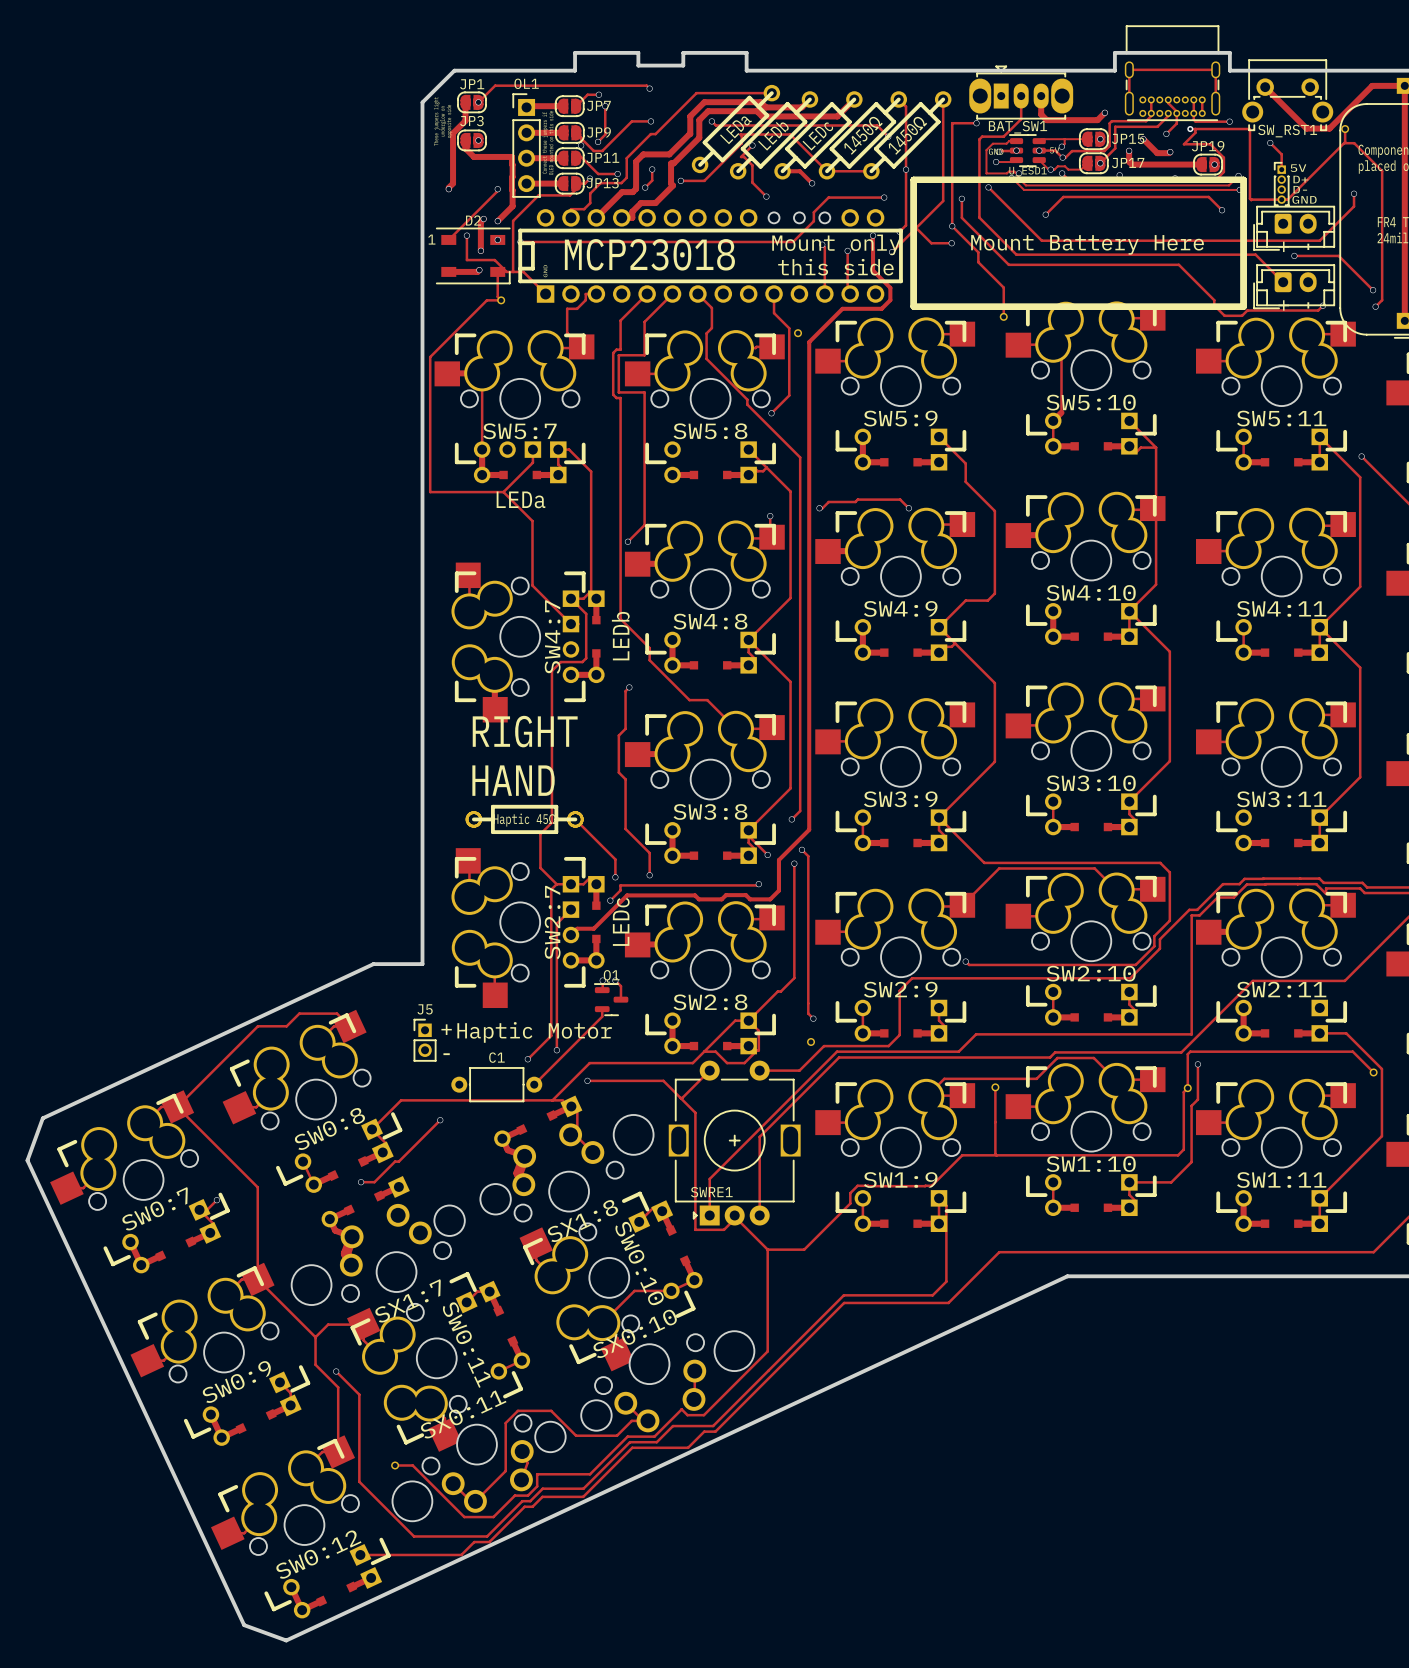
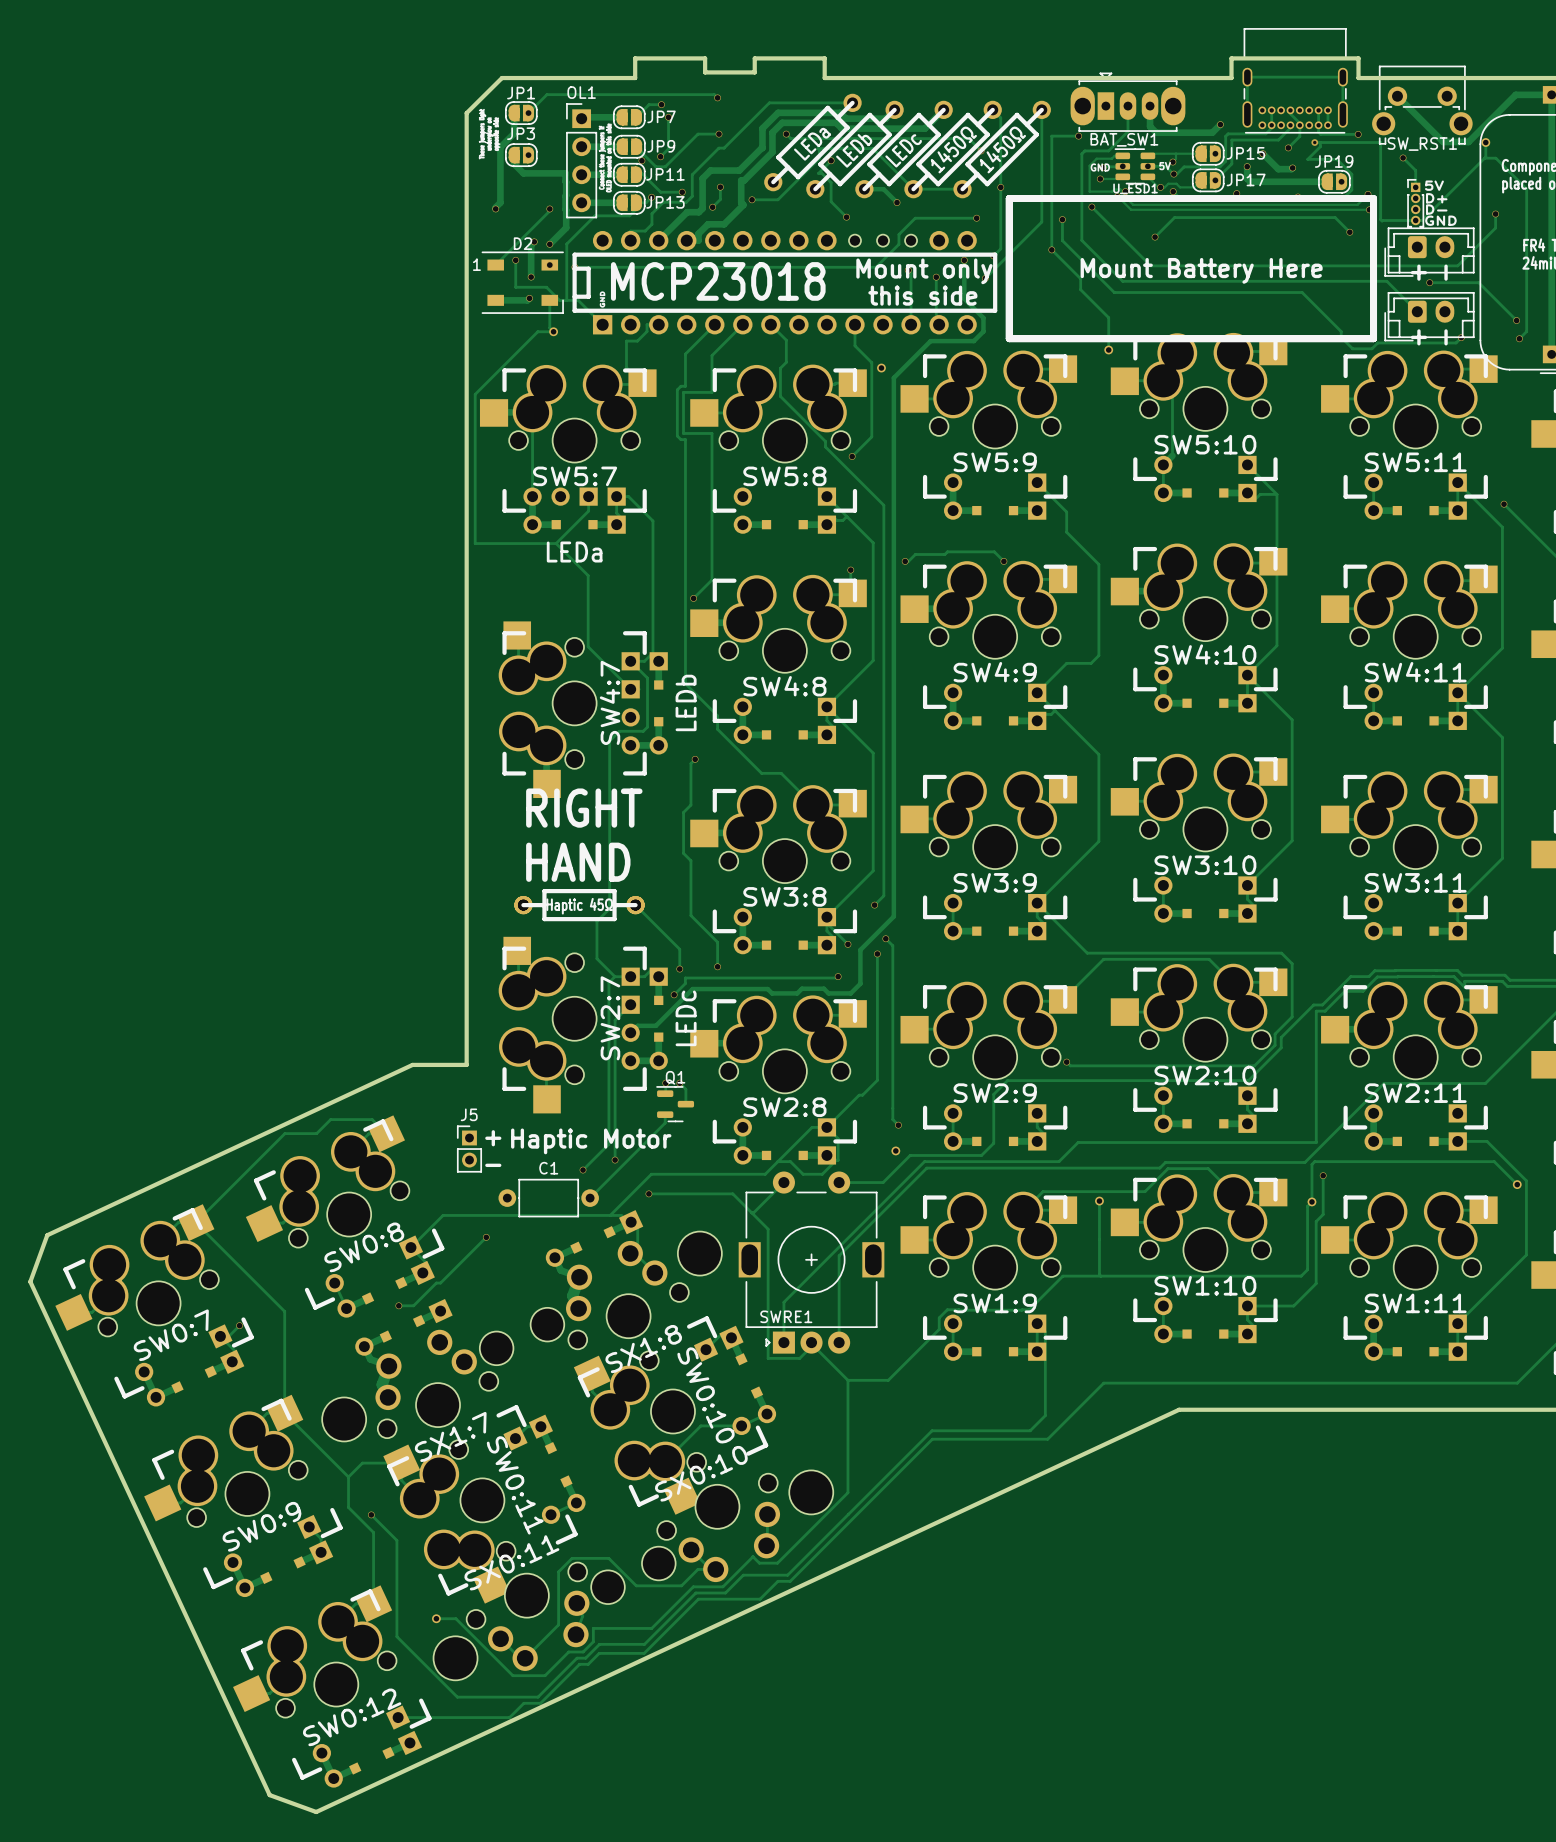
track: (916, 228) (931, 243) (951, 243) -> none
via: (951, 243) -> none

